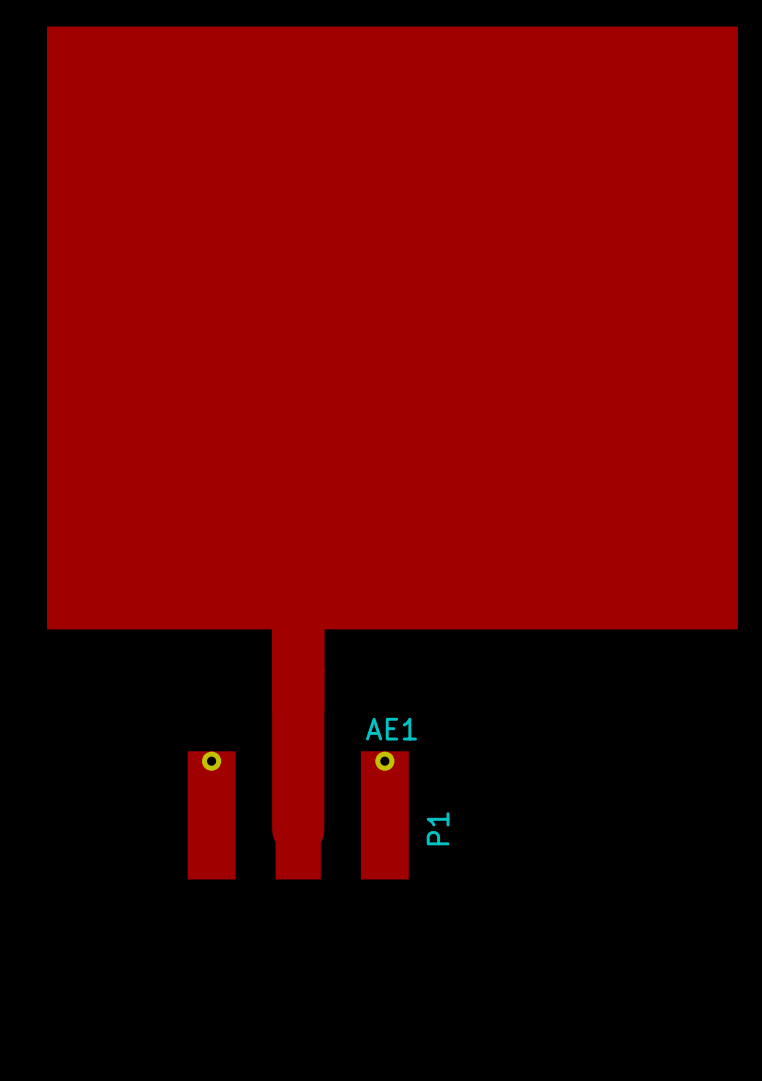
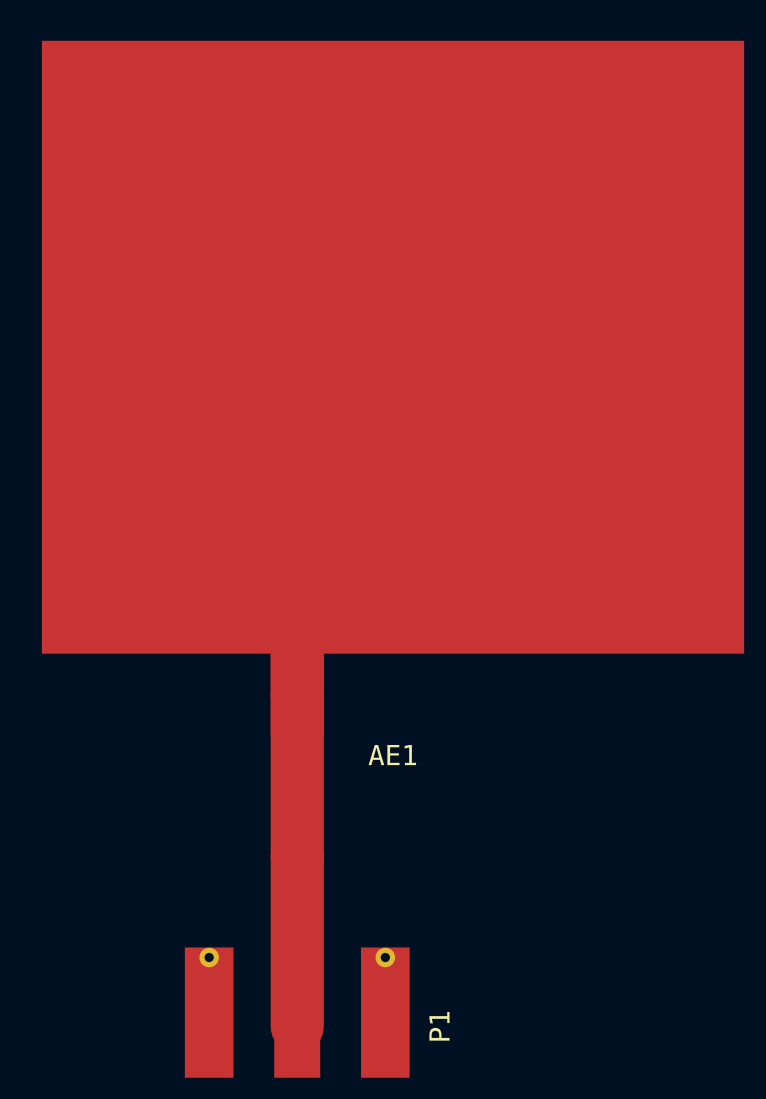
P1 position: (298, 815) -> (297, 1012)
track: none -> (297, 856) (297, 1026)

